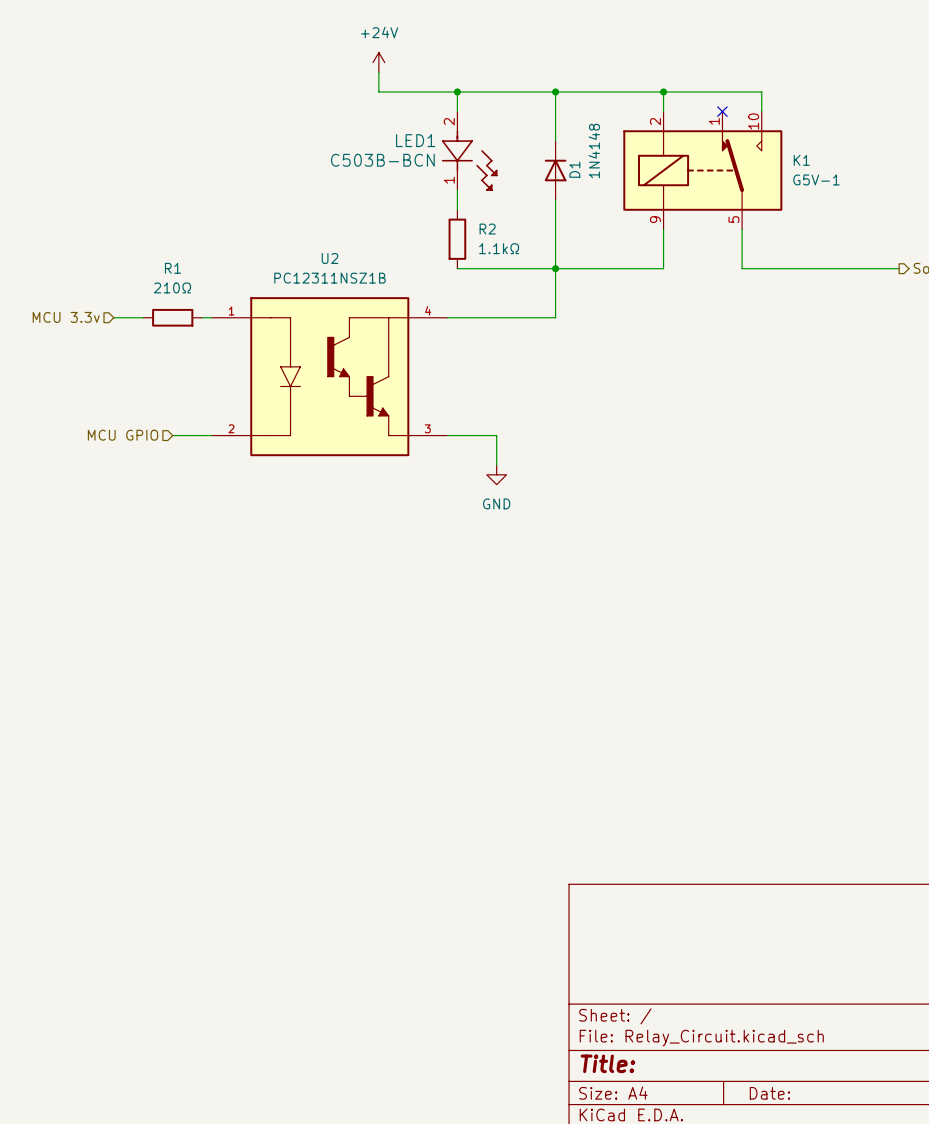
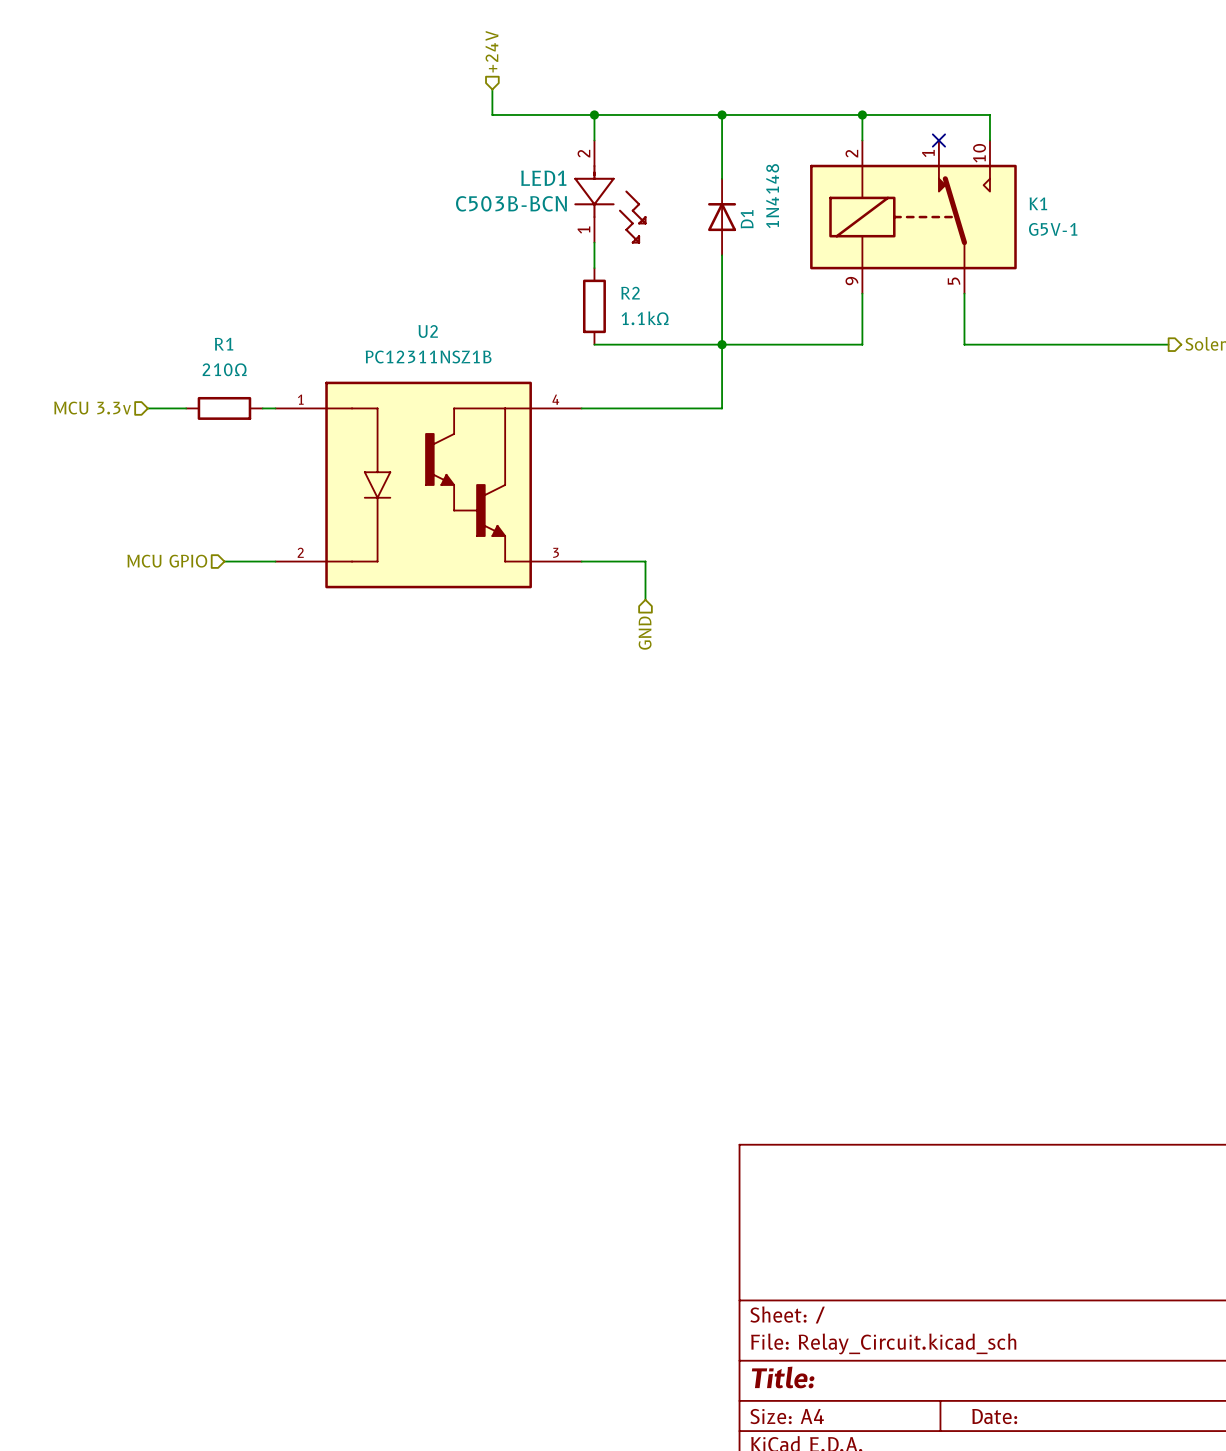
hierarchical label: none -> +24V (492, 51)
power symbol: +24V (378, 62) -> none
power symbol: GND (496, 474) -> none
hierarchical label: none -> GND (645, 633)

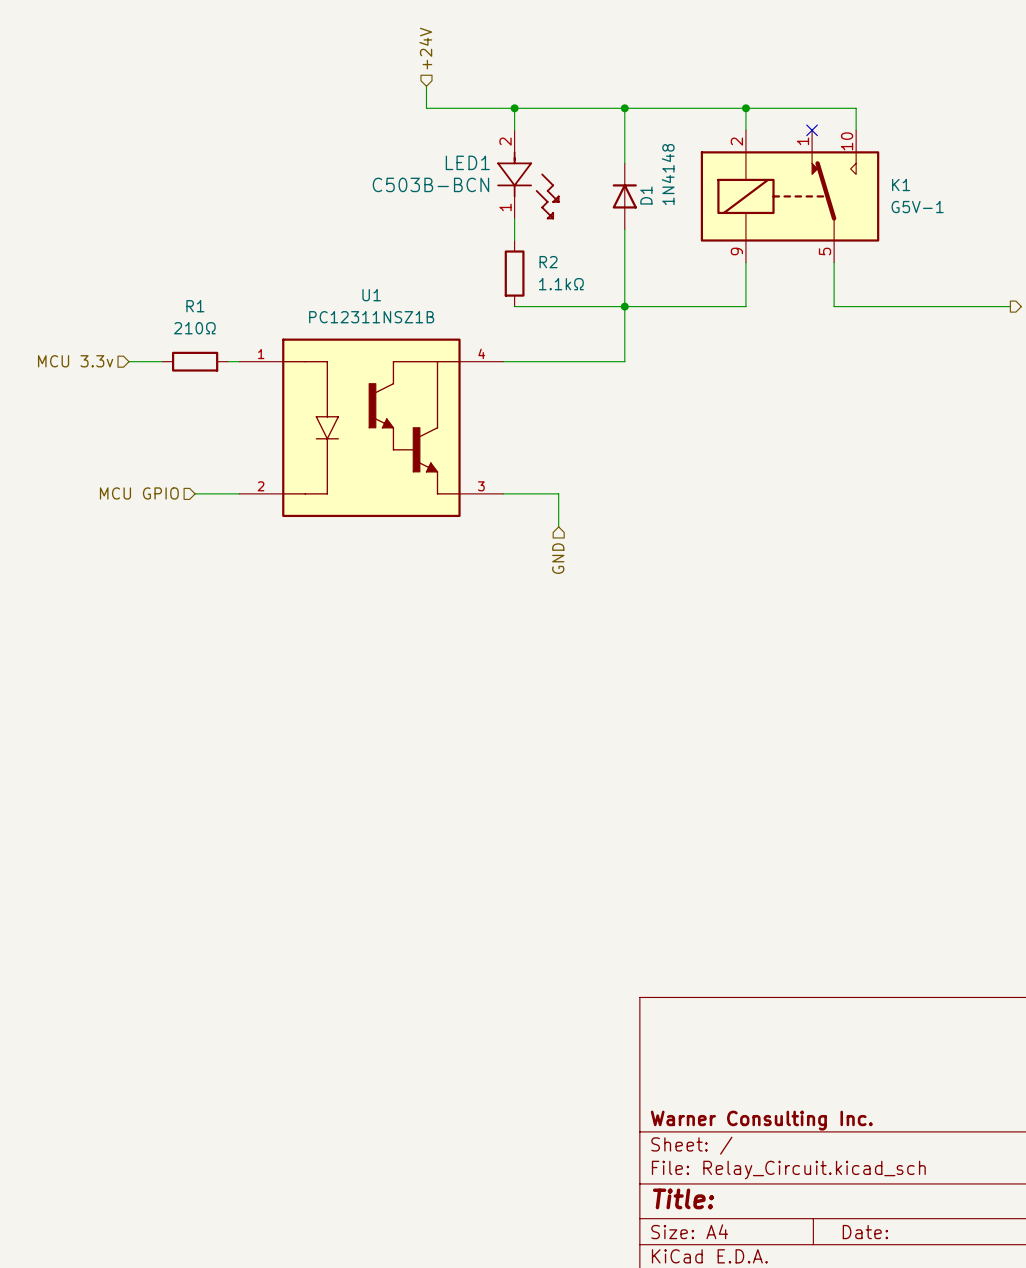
U2 name: U2 (428, 331) -> U1 (371, 295)
title block: none -> Warner Consulting Inc. (761, 1120)

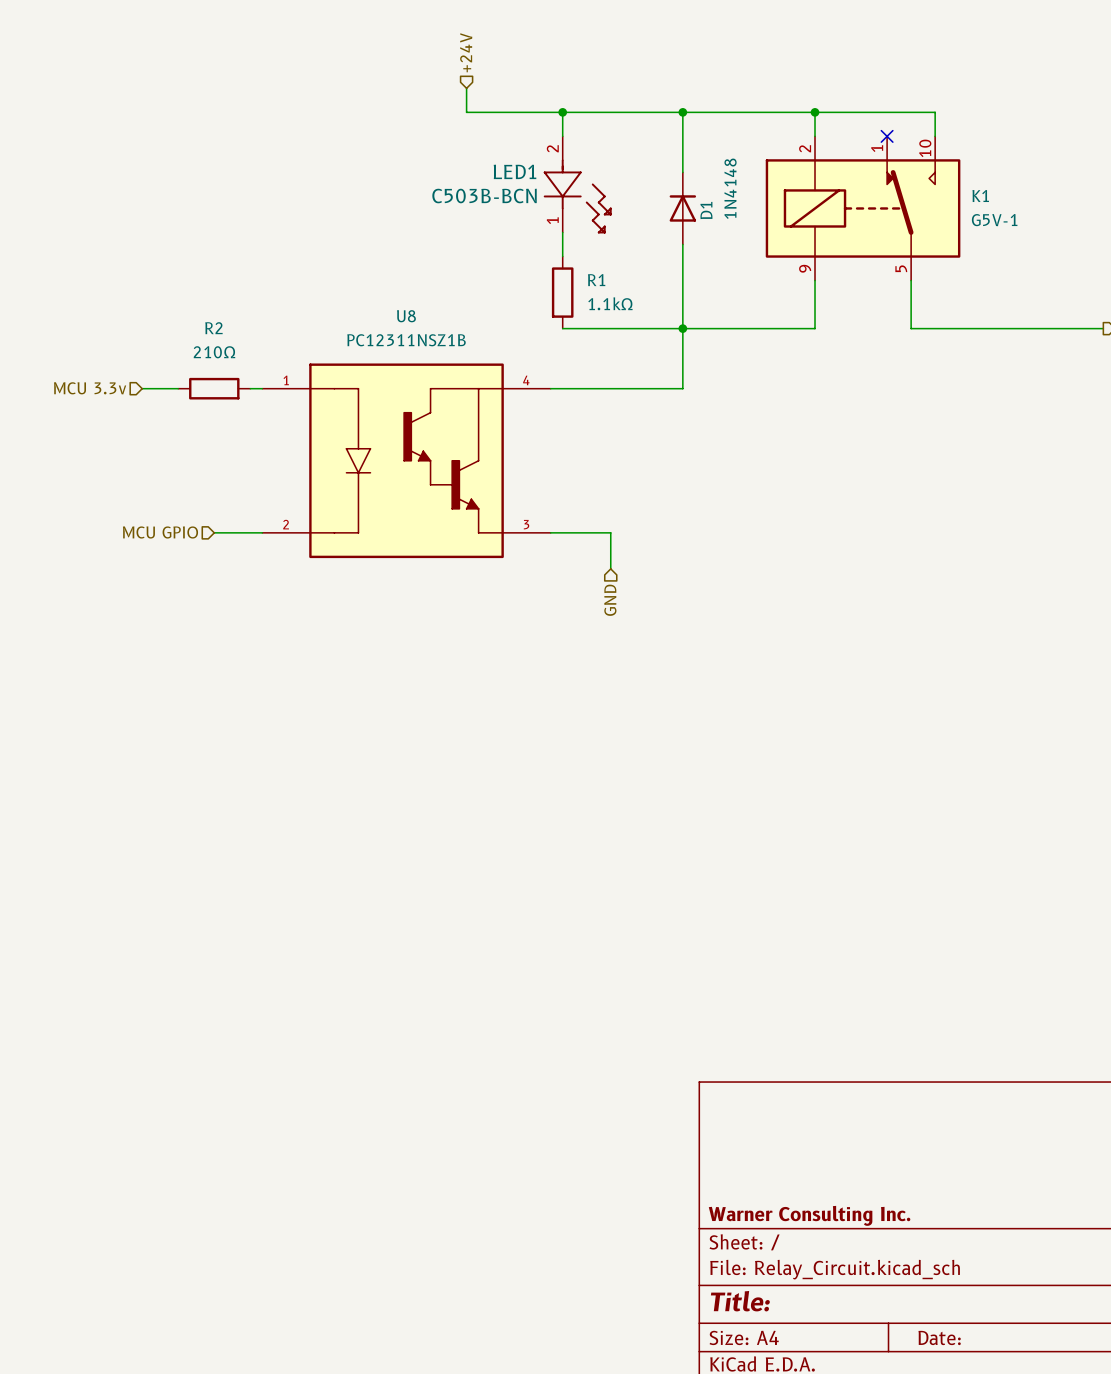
R2 name: R2 (548, 262) -> R1 (596, 280)
U1 name: U1 (371, 295) -> U8 (406, 316)
R1 name: R1 (195, 306) -> R2 (213, 328)

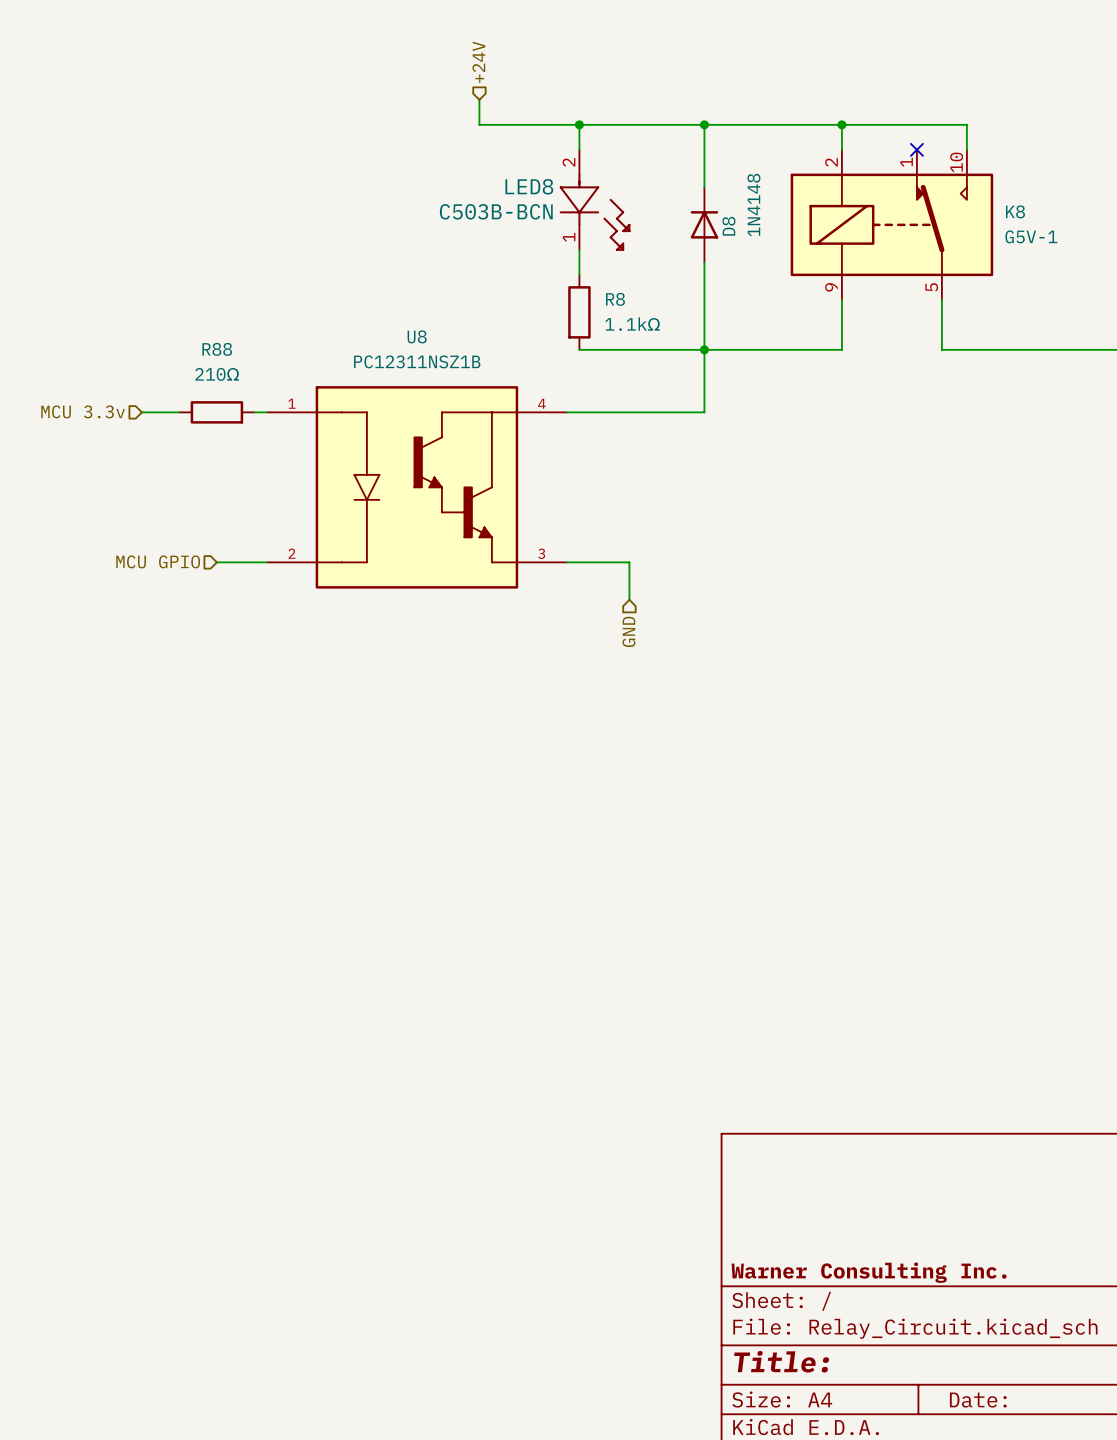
LED1 name: LED1 (515, 171) -> LED8 (529, 186)
K1 name: K1 (980, 196) -> K8 (1015, 211)
D1 name: D1 (706, 210) -> D8 (728, 226)
R1 name: R1 (596, 280) -> R8 (615, 299)
R2 name: R2 (213, 328) -> R88 (217, 349)

